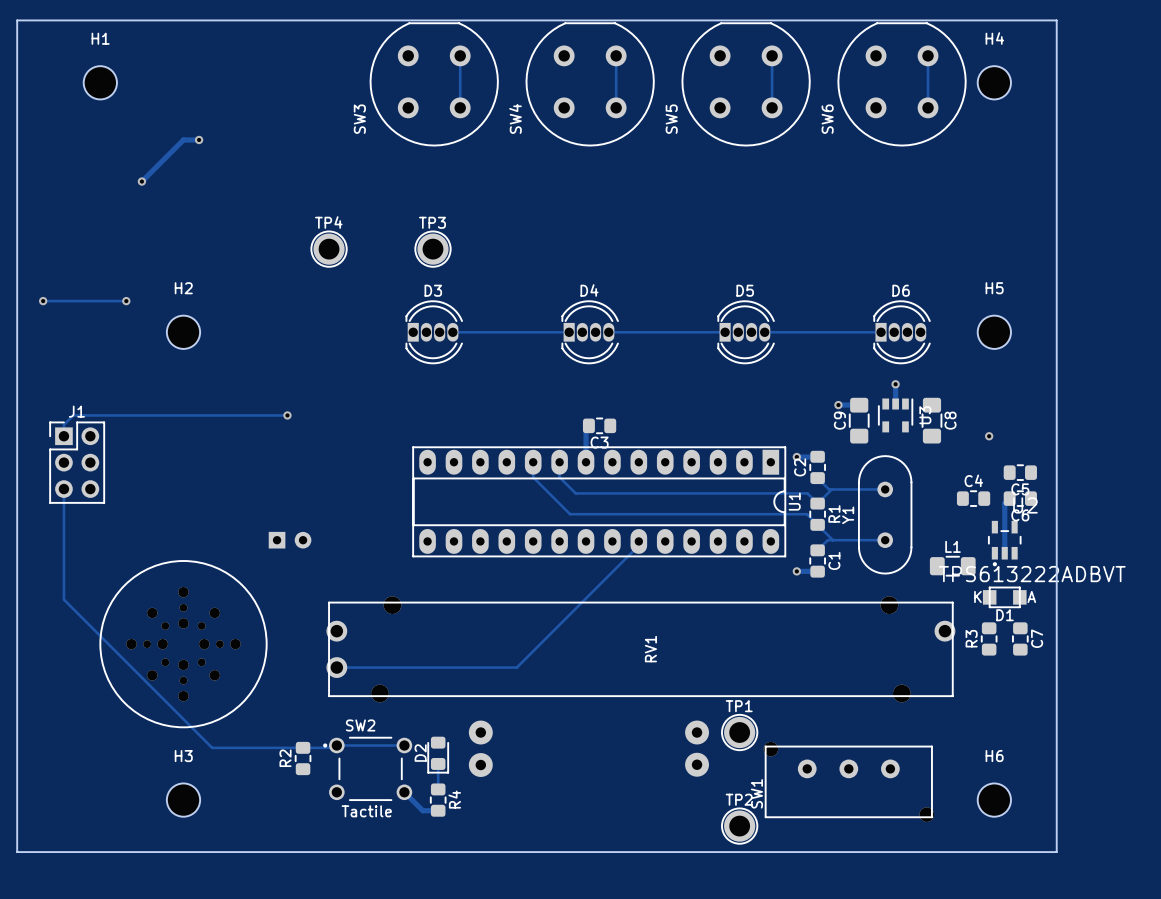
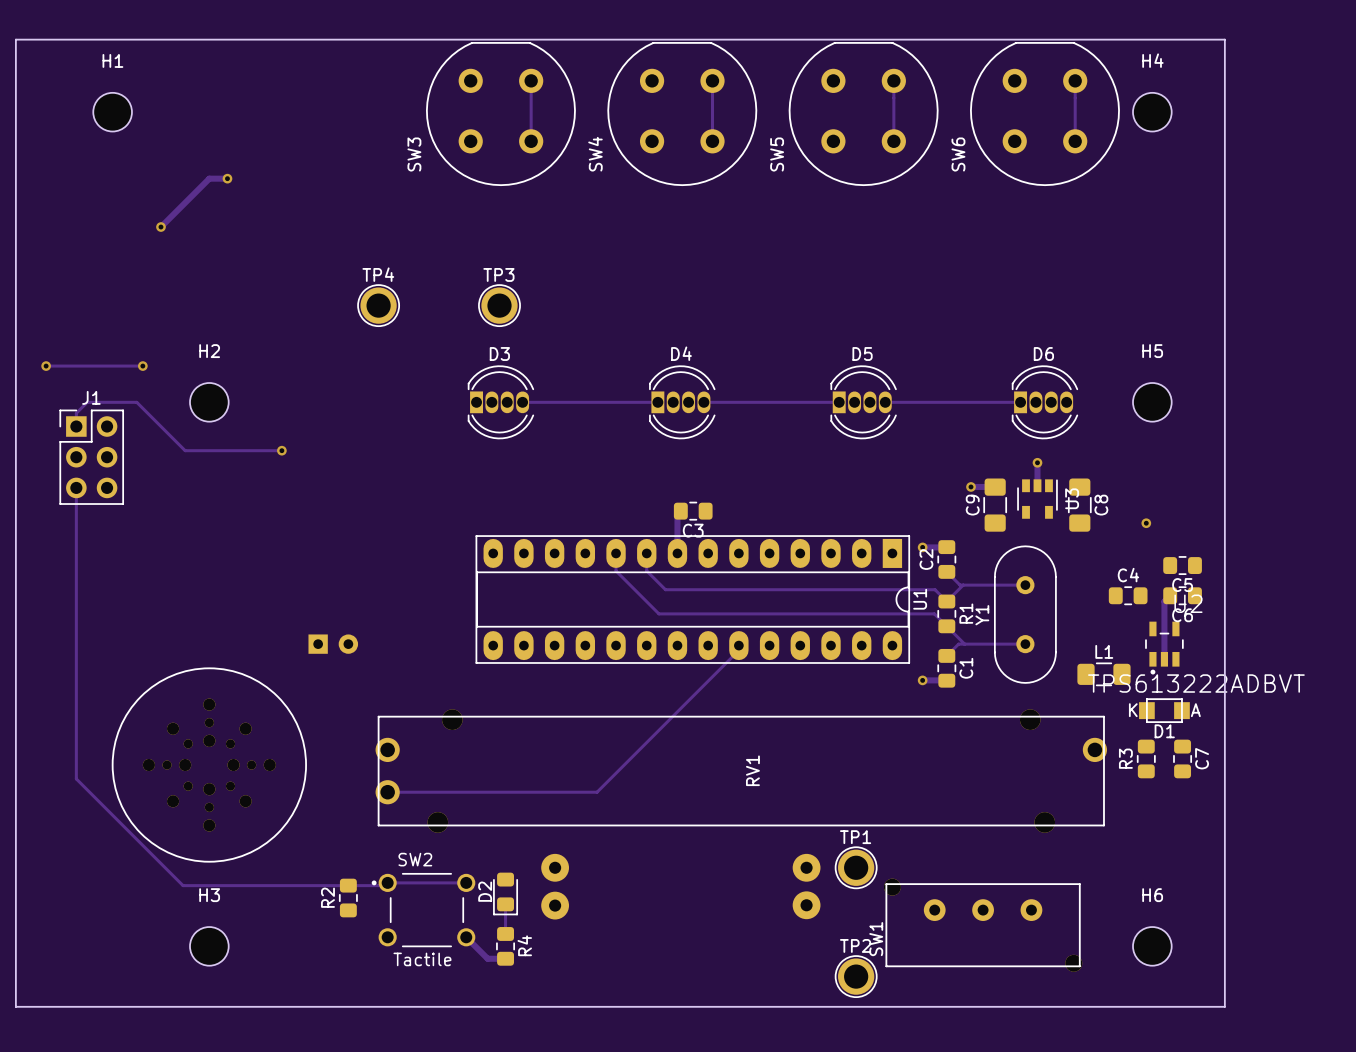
track: none -> (76, 426) (76, 413) (87, 402) (136, 402) (185, 450) (281, 450)
track: (287, 415) (73, 415) (63, 424) (63, 436) -> none
via position: (287, 415) -> (281, 450)
J1 position: (77, 462) -> (91, 457)
track: (63, 494) (63, 599) (212, 747) -> (76, 487) (76, 778) (183, 885) (242, 885)

